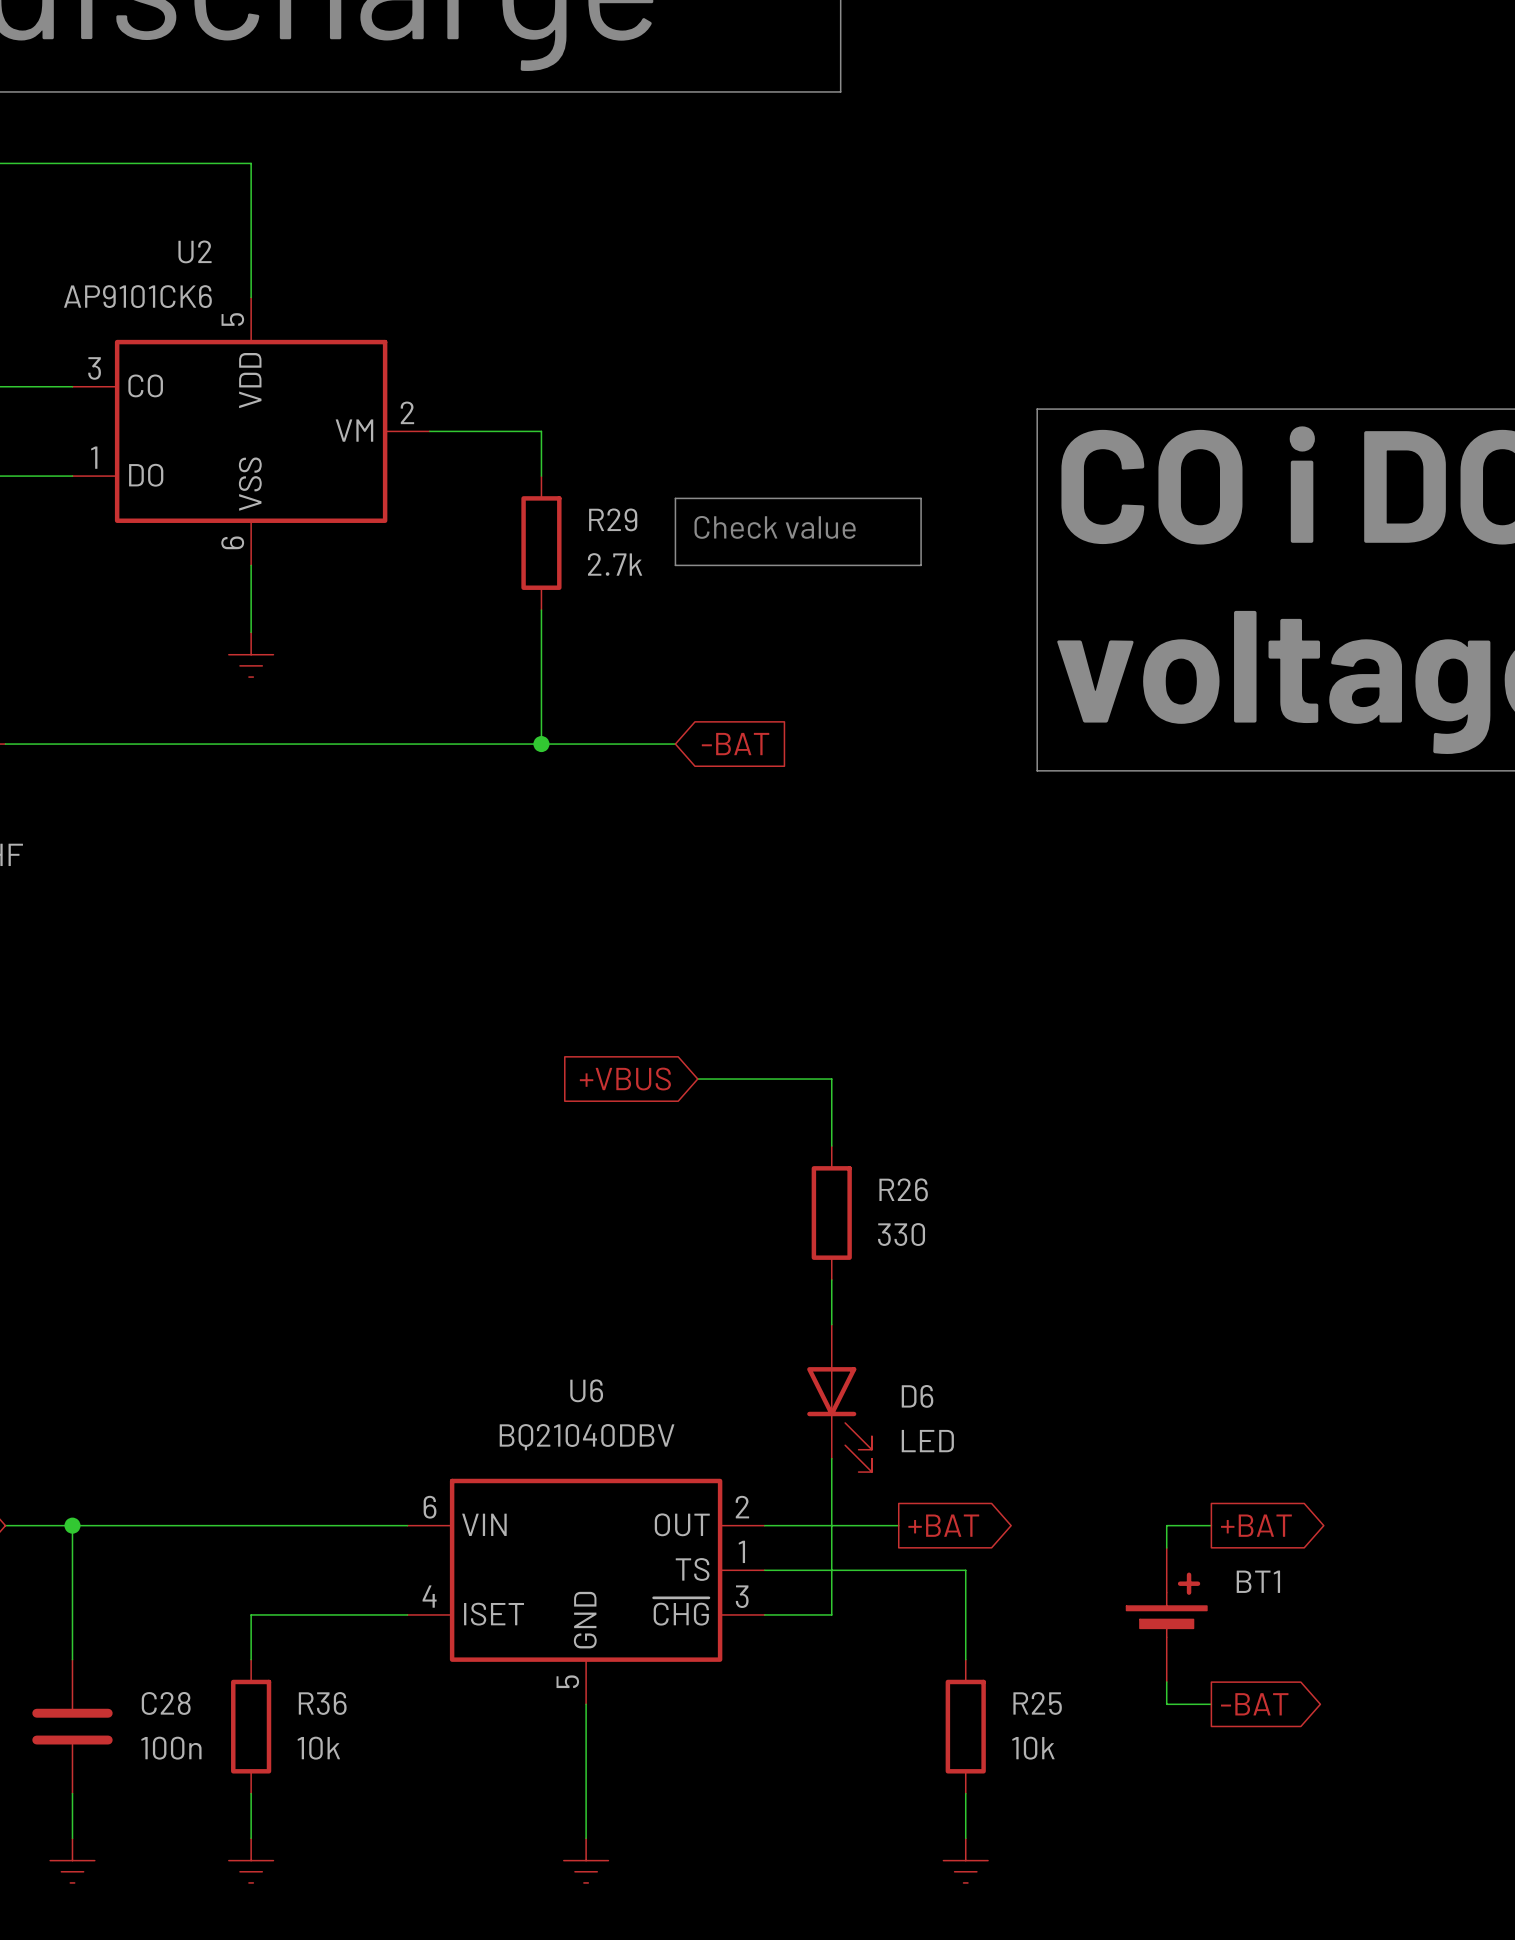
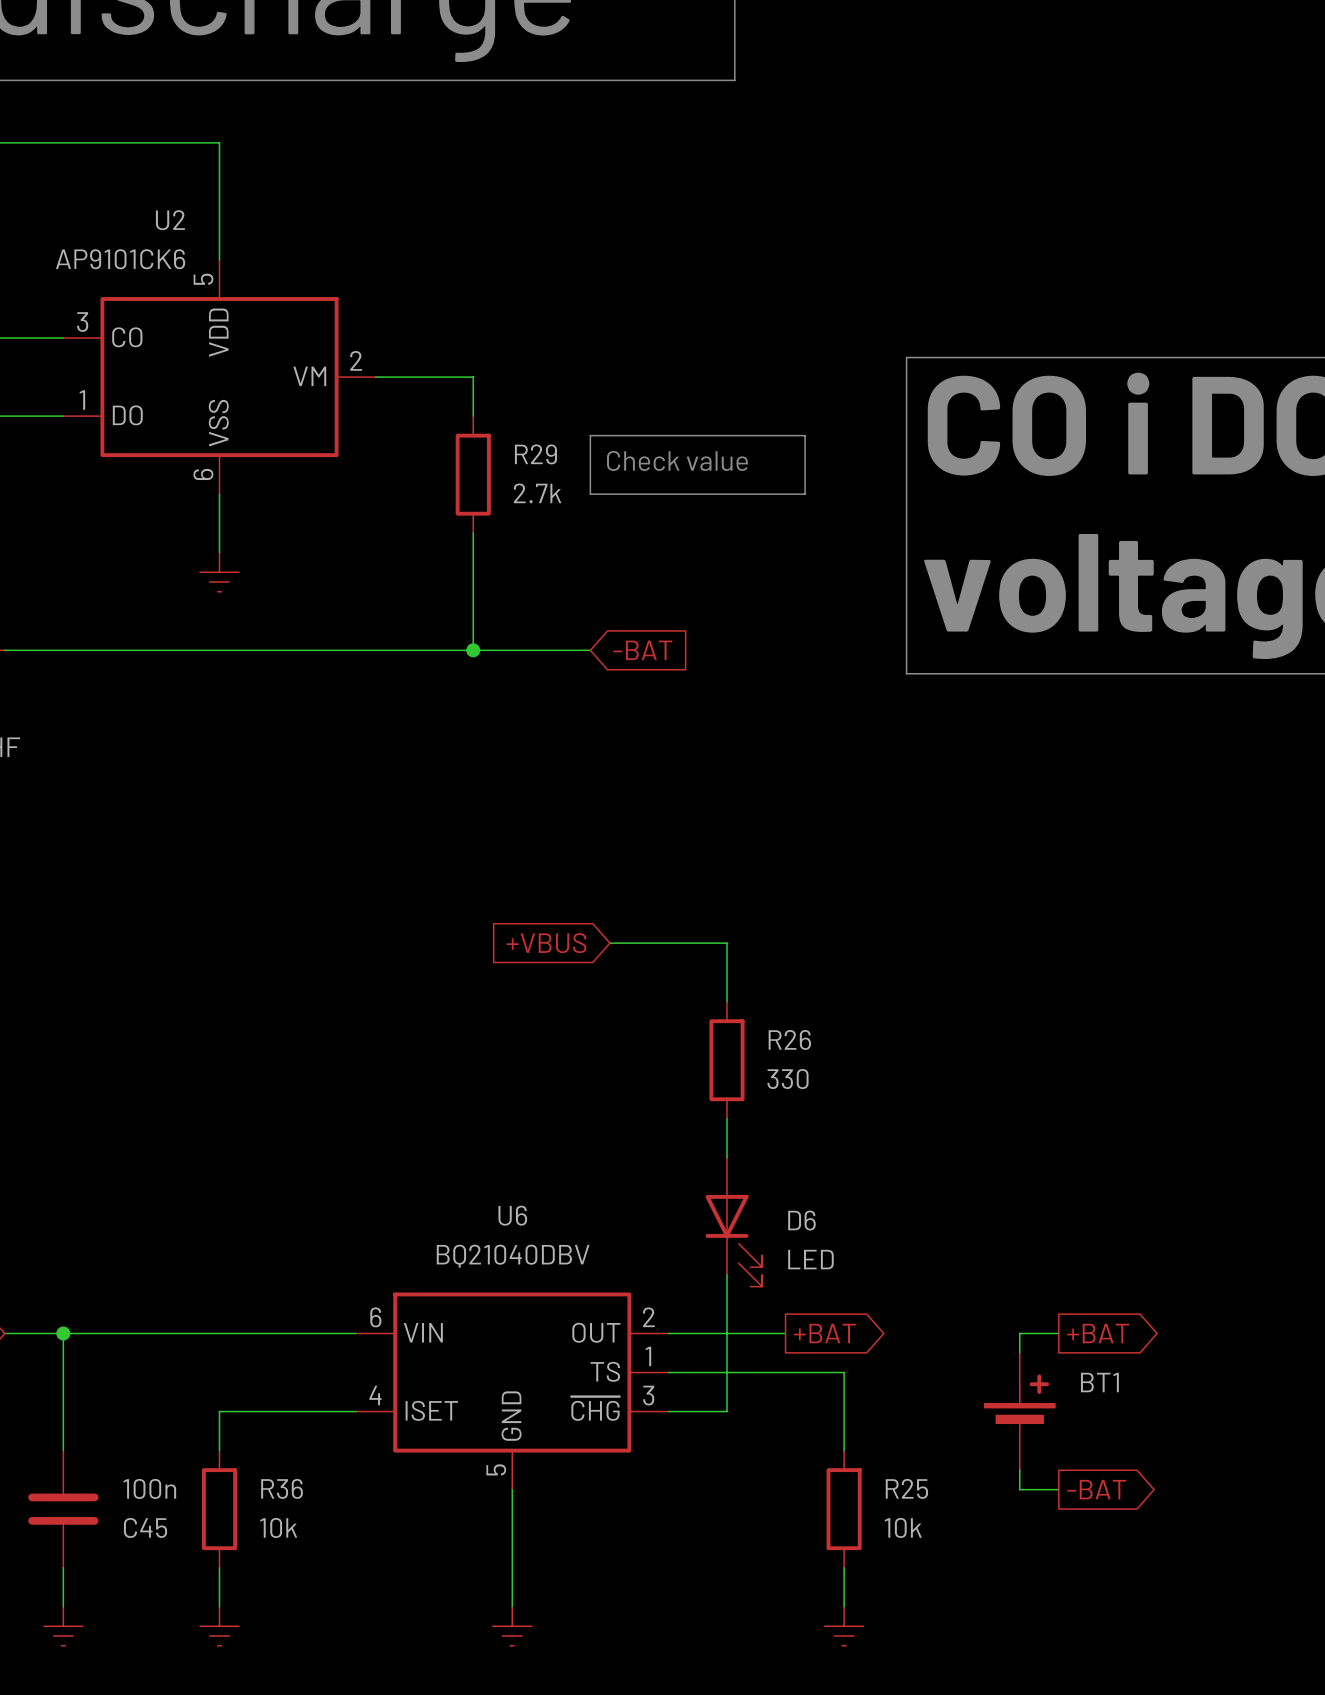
C28 name: C28 (166, 1703) -> C45 (145, 1527)
C28 value position: 100n (171, 1748) -> 100n (149, 1488)

